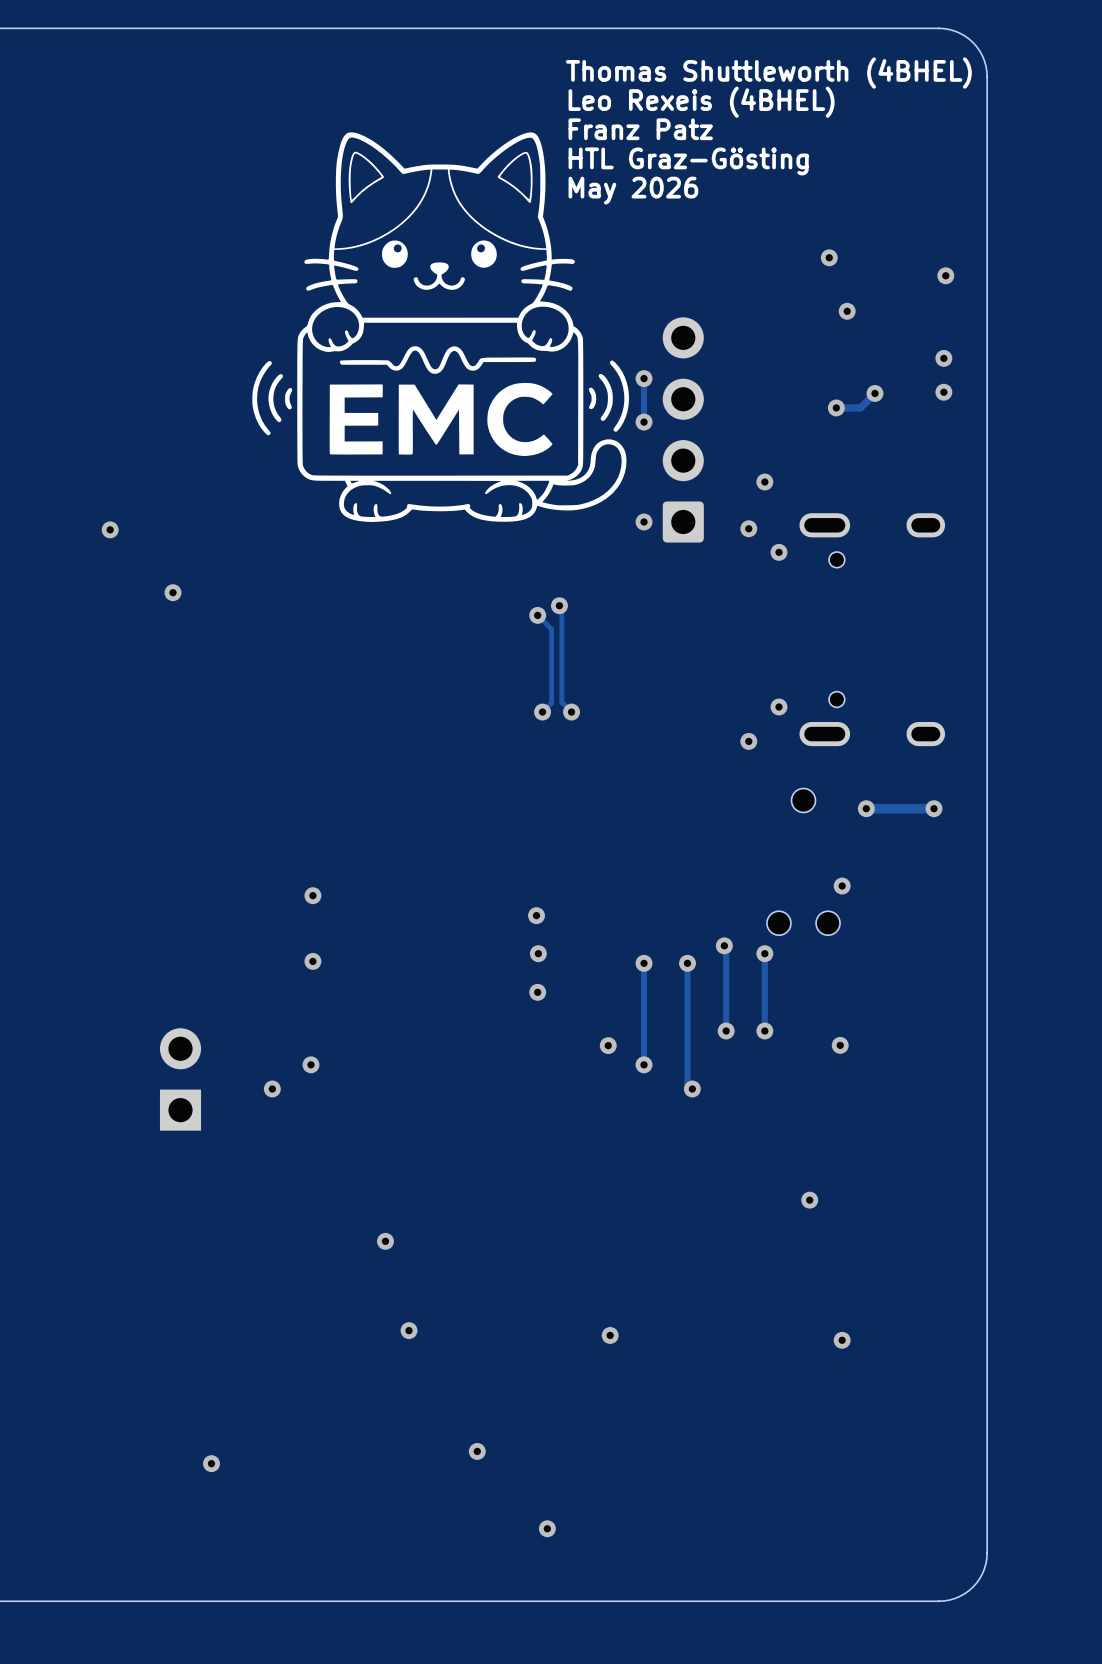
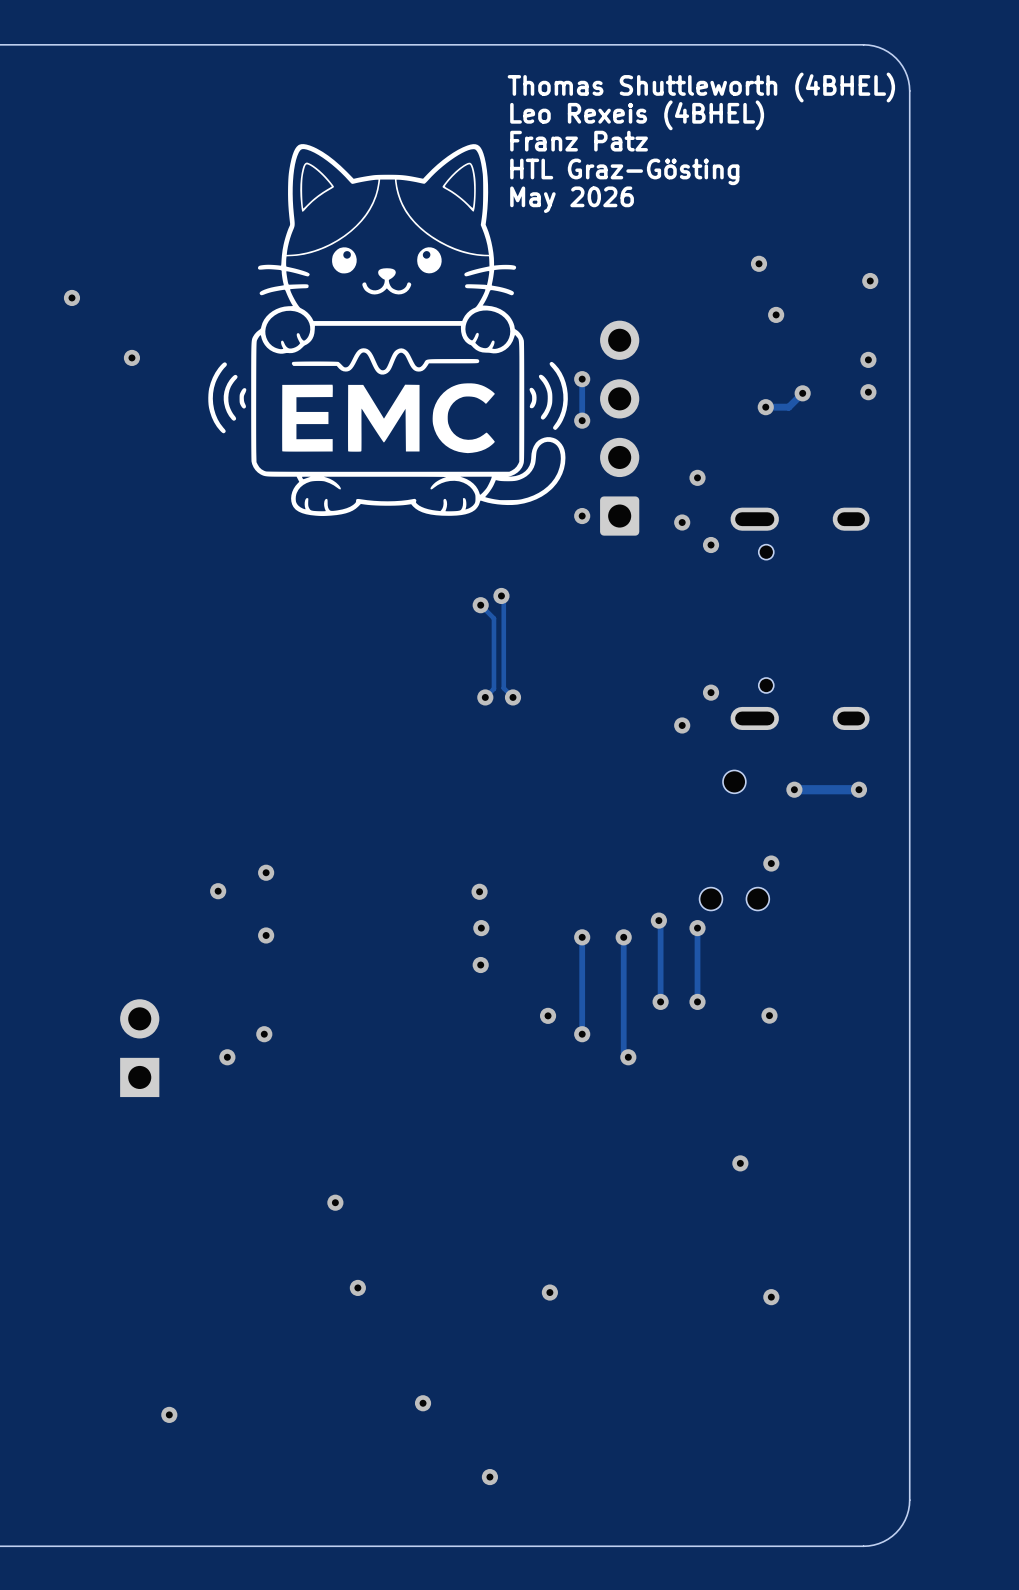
via: none -> (71, 297)
via: none -> (131, 357)
via: (110, 529) -> none
via: (173, 592) -> none
via: none -> (218, 891)

